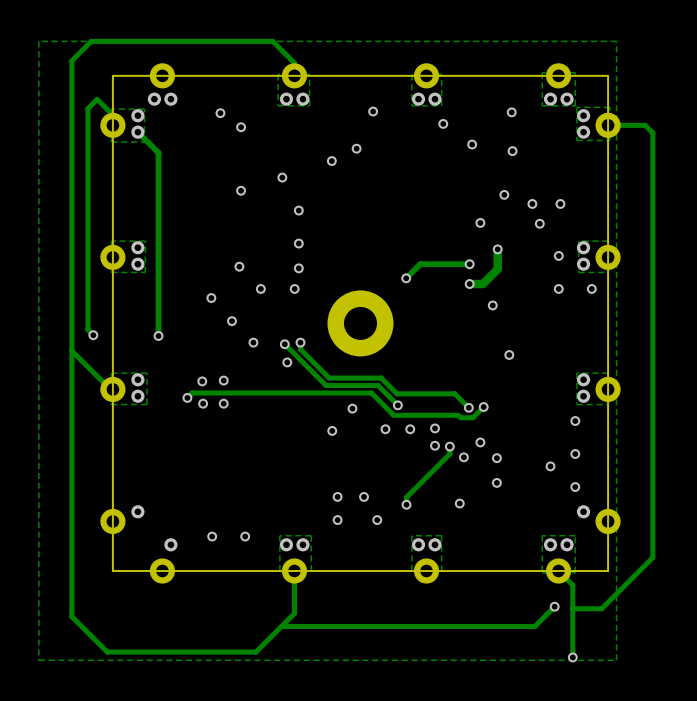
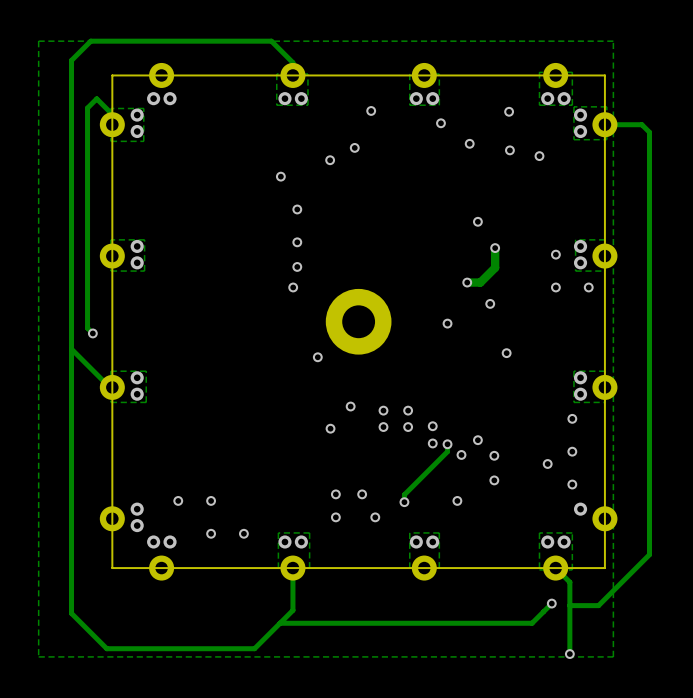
via: (220, 113) -> none
via: (241, 127) -> none
track: (137, 132) (158, 152) (158, 336) -> none
via: none -> (539, 156)
via: (241, 190) -> none
via: (504, 194) -> none
via: (532, 203) -> none
via: (560, 203) -> none
via: (539, 223) -> none
track: (469, 264) (420, 264) (406, 278) -> none
via: (469, 264) -> none
via: (239, 266) -> none
via: (406, 278) -> none
via: (260, 288) -> none
via: (211, 298) -> none
via: (231, 321) -> none
via: none -> (447, 323)
via: (158, 336) -> none
via: (253, 342) -> none
track: (300, 342) (300, 349) (329, 378) (381, 378) (396, 393) (454, 393) (468, 407) -> none
via: (300, 342) -> none
track: (284, 344) (326, 385) (378, 385) (397, 405) -> none
via: (284, 344) -> none
via: none -> (317, 357)
via: (287, 362) -> none
via: (223, 380) -> none
via: (202, 381) -> none
track: (187, 397) (192, 393) (371, 393) (393, 415) (458, 415) (460, 417) (472, 417) (483, 407) -> none
via: (187, 397) -> none
via: (203, 403) -> none
via: (223, 403) -> none
via: (397, 405) -> none
via: (483, 406) -> none
via: (468, 407) -> none
via: none -> (383, 410)
via: none -> (408, 410)
via: none -> (178, 500)
via: none -> (211, 500)
via: none -> (137, 525)
via: none -> (153, 541)

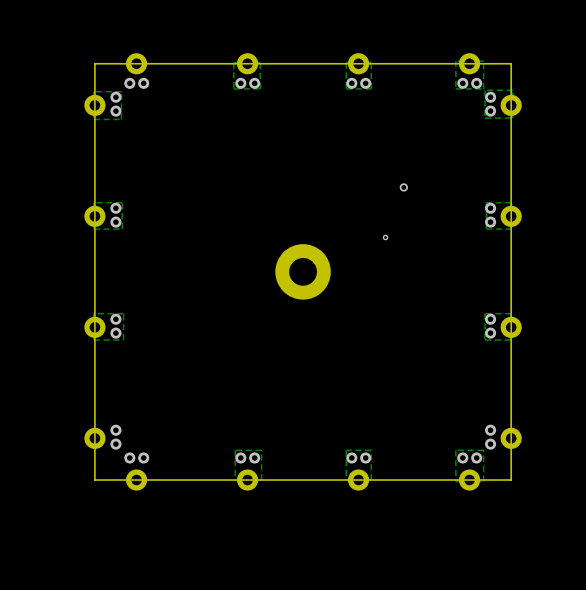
zone outline: (613, 41) (613, 656) (38, 656) (38, 41) (613, 41) -> none
track: (292, 72) (292, 62) (271, 41) (90, 41) (71, 60) (71, 613) (106, 648) (254, 648) (292, 610) (292, 570) -> none
via: (371, 110) -> none
via: (509, 111) -> none
via: (440, 123) -> none
track: (109, 124) (109, 111) (96, 98) (87, 108) (87, 328) (92, 333) -> none
track: (607, 124) (641, 124) (649, 132) (649, 554) (598, 605) (569, 605) -> none
via: (469, 143) -> none
via: (354, 147) -> none
via: (509, 150) -> none
via: (539, 156) -> none
via: (330, 160) -> none
via: (280, 176) -> none
via: (297, 209) -> none
via: (297, 242) -> none
track: (495, 248) (495, 267) (480, 282) (467, 282) -> none
via: (495, 248) -> none
via: (555, 254) -> none
via: (297, 266) -> none
via: none -> (385, 237)
via: (467, 282) -> none
via: (293, 287) -> none
via: (555, 287) -> none
via: (588, 287) -> none
via: (490, 303) -> none
via: (447, 323) -> none
via: (92, 333) -> none
track: (71, 349) (109, 387) -> none
via: (506, 353) -> none
via: (317, 357) -> none
via: (350, 406) -> none
via: (383, 410) -> none
via: (408, 410) -> none
via: (572, 418) -> none
via: (432, 426) -> none
via: (383, 427) -> none
via: (408, 427) -> none
via: (330, 428) -> none
via: (477, 440) -> none
via: (432, 443) -> none
track: (447, 444) (447, 451) (404, 494) (404, 502) -> none
via: (447, 444) -> none
via: (572, 451) -> none
via: (461, 454) -> none
via: (494, 455) -> none
via: (547, 463) -> none
via: (494, 480) -> none
via: (572, 484) -> none
via: (335, 494) -> none
via: (362, 494) -> none
via: (178, 500) -> none
via: (211, 500) -> none
via: (457, 500) -> none
via: (404, 502) -> none
via: (335, 517) -> none
via: (375, 517) -> none
via: none -> (490, 444)
via: (211, 533) -> none
via: (243, 533) -> none
track: (555, 570) (558, 570) (569, 582) (569, 654) -> none
track: (551, 603) (532, 623) (280, 623) -> none
via: (551, 603) -> none
via: (569, 654) -> none

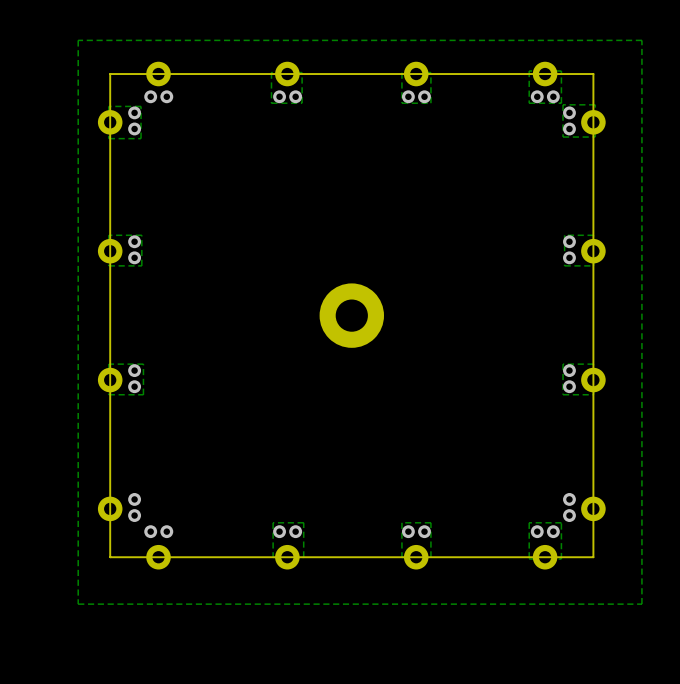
zone outline: none -> (641, 40) (641, 604) (78, 604) (78, 40) (641, 40)
via: (403, 187) -> none
via: (385, 237) -> none

